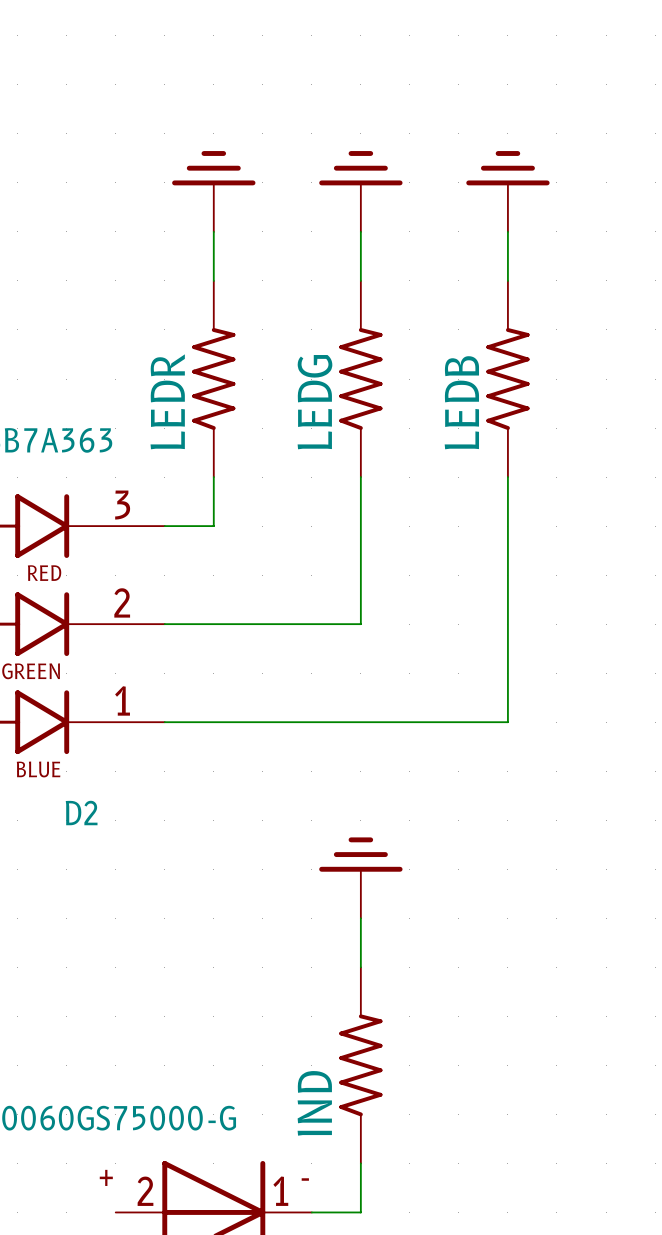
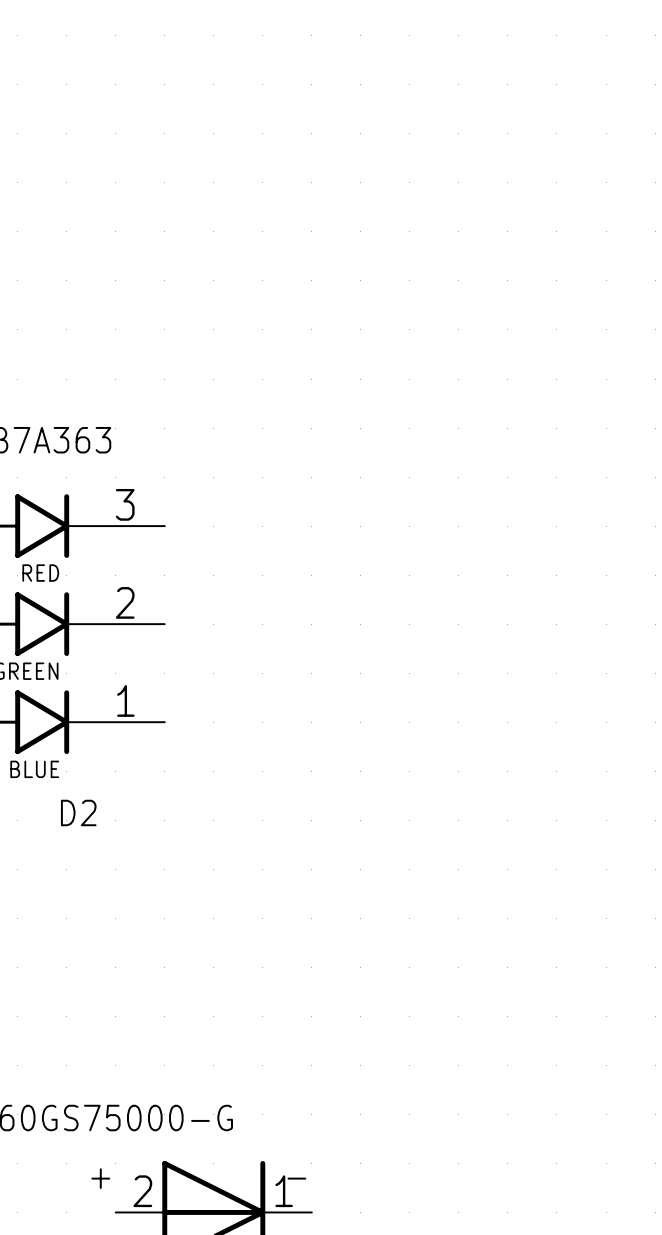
power symbol: (213, 191) -> none
power symbol: (360, 191) -> none
power symbol: (507, 191) -> none
wire: (213, 231) (213, 280) -> none
wire: (360, 231) (360, 280) -> none
wire: (507, 231) (507, 280) -> none
LEDR: (213, 379) -> none
LEDG: (360, 379) -> none
LEDB: (507, 379) -> none
wire: (213, 477) (213, 526) (164, 526) -> none
wire: (360, 477) (360, 624) (164, 624) -> none
wire: (507, 477) (507, 722) (164, 722) -> none
power symbol: (360, 877) -> none
wire: (360, 918) (360, 967) -> none
IND: (360, 1065) -> none
wire: (360, 1163) (360, 1212) (311, 1212) -> none

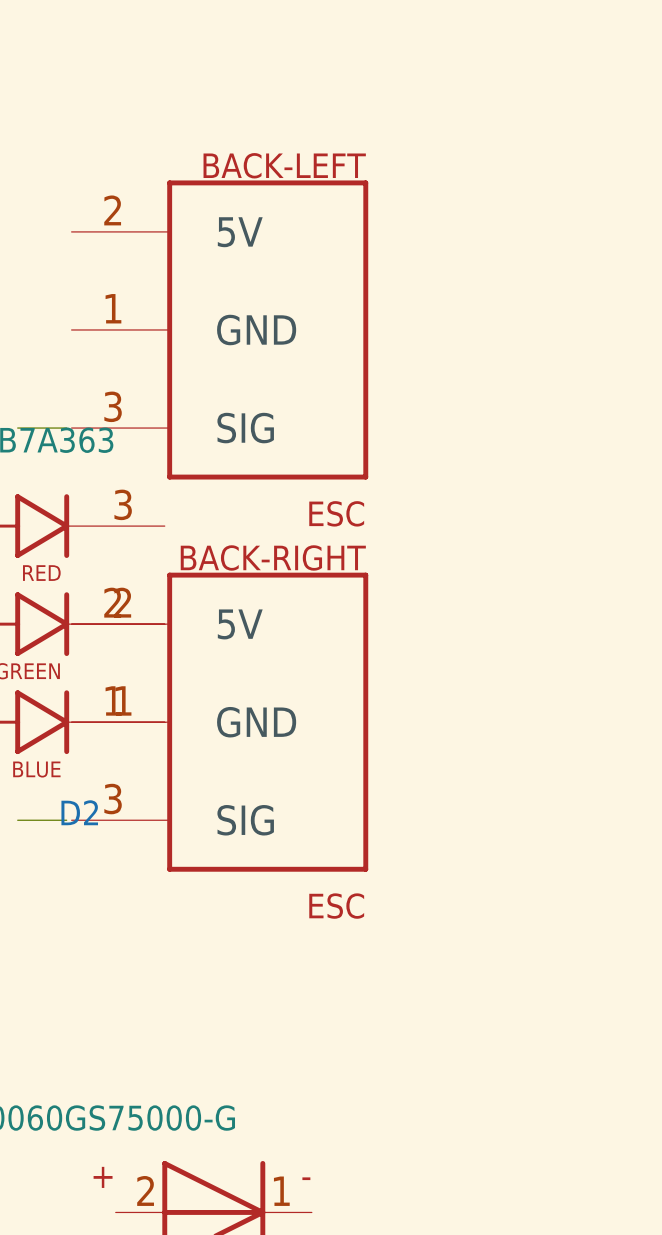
BACK-LEFT: none -> (219, 329)
wire: none -> (17, 428) (66, 428)
BACK-RIGHT: none -> (219, 722)
wire: none -> (17, 820) (66, 820)

